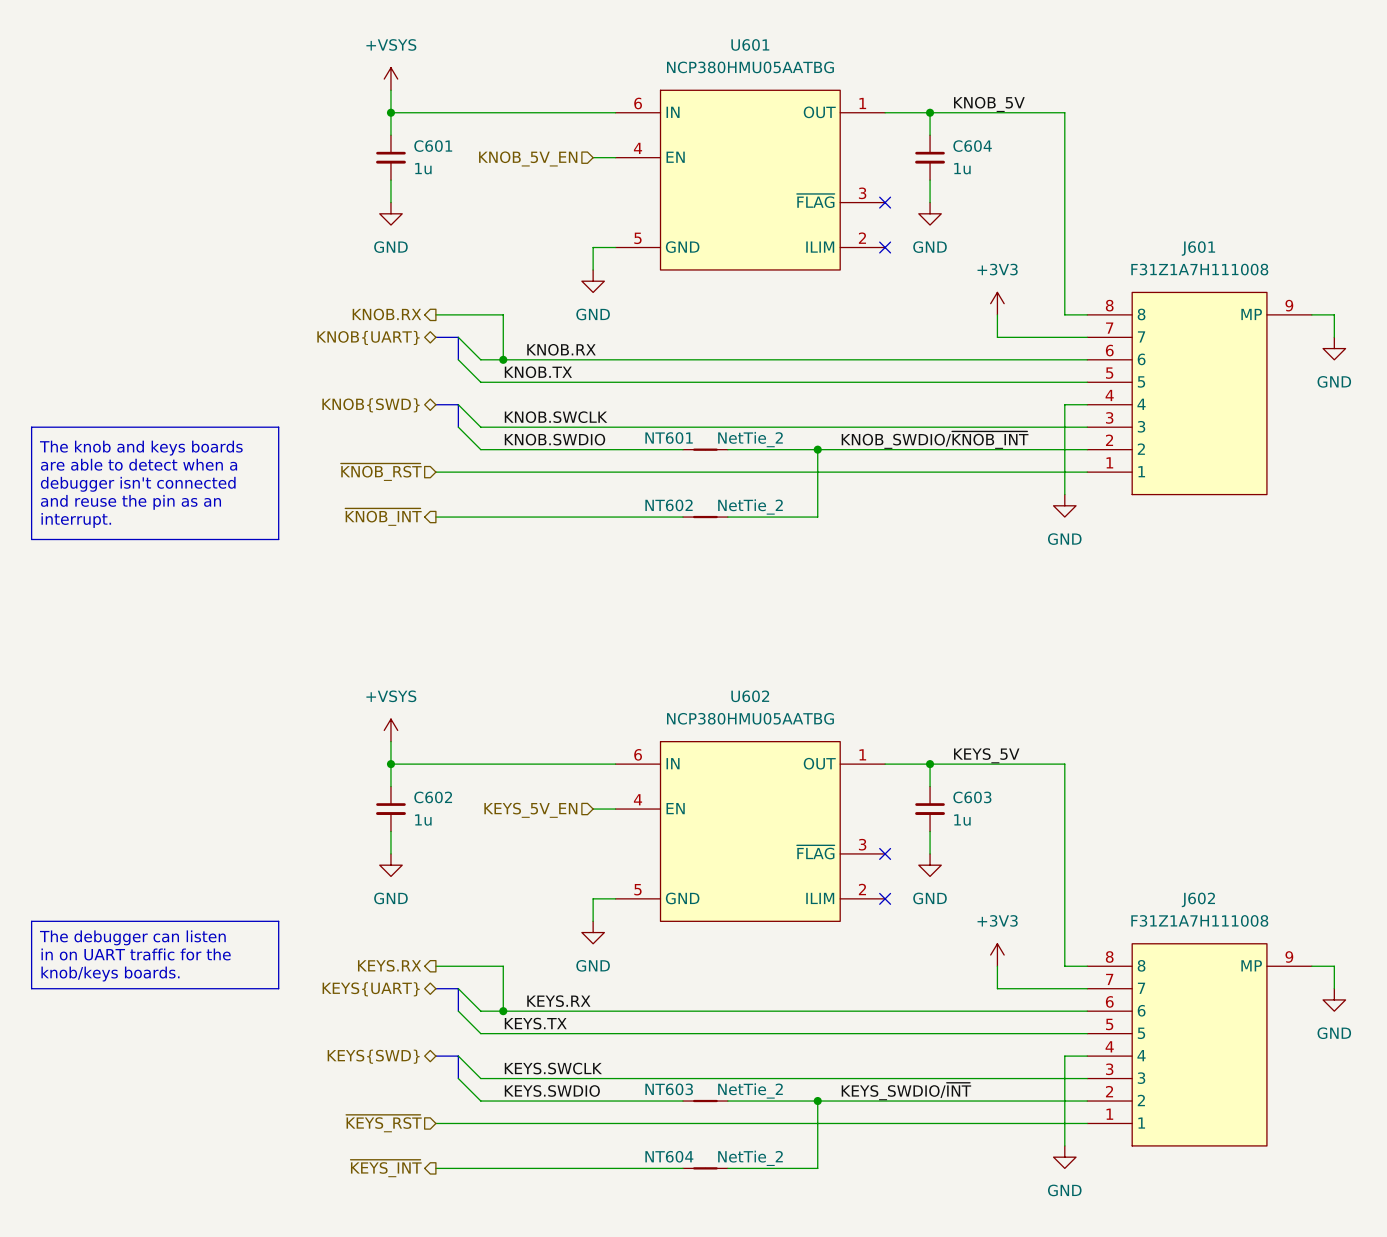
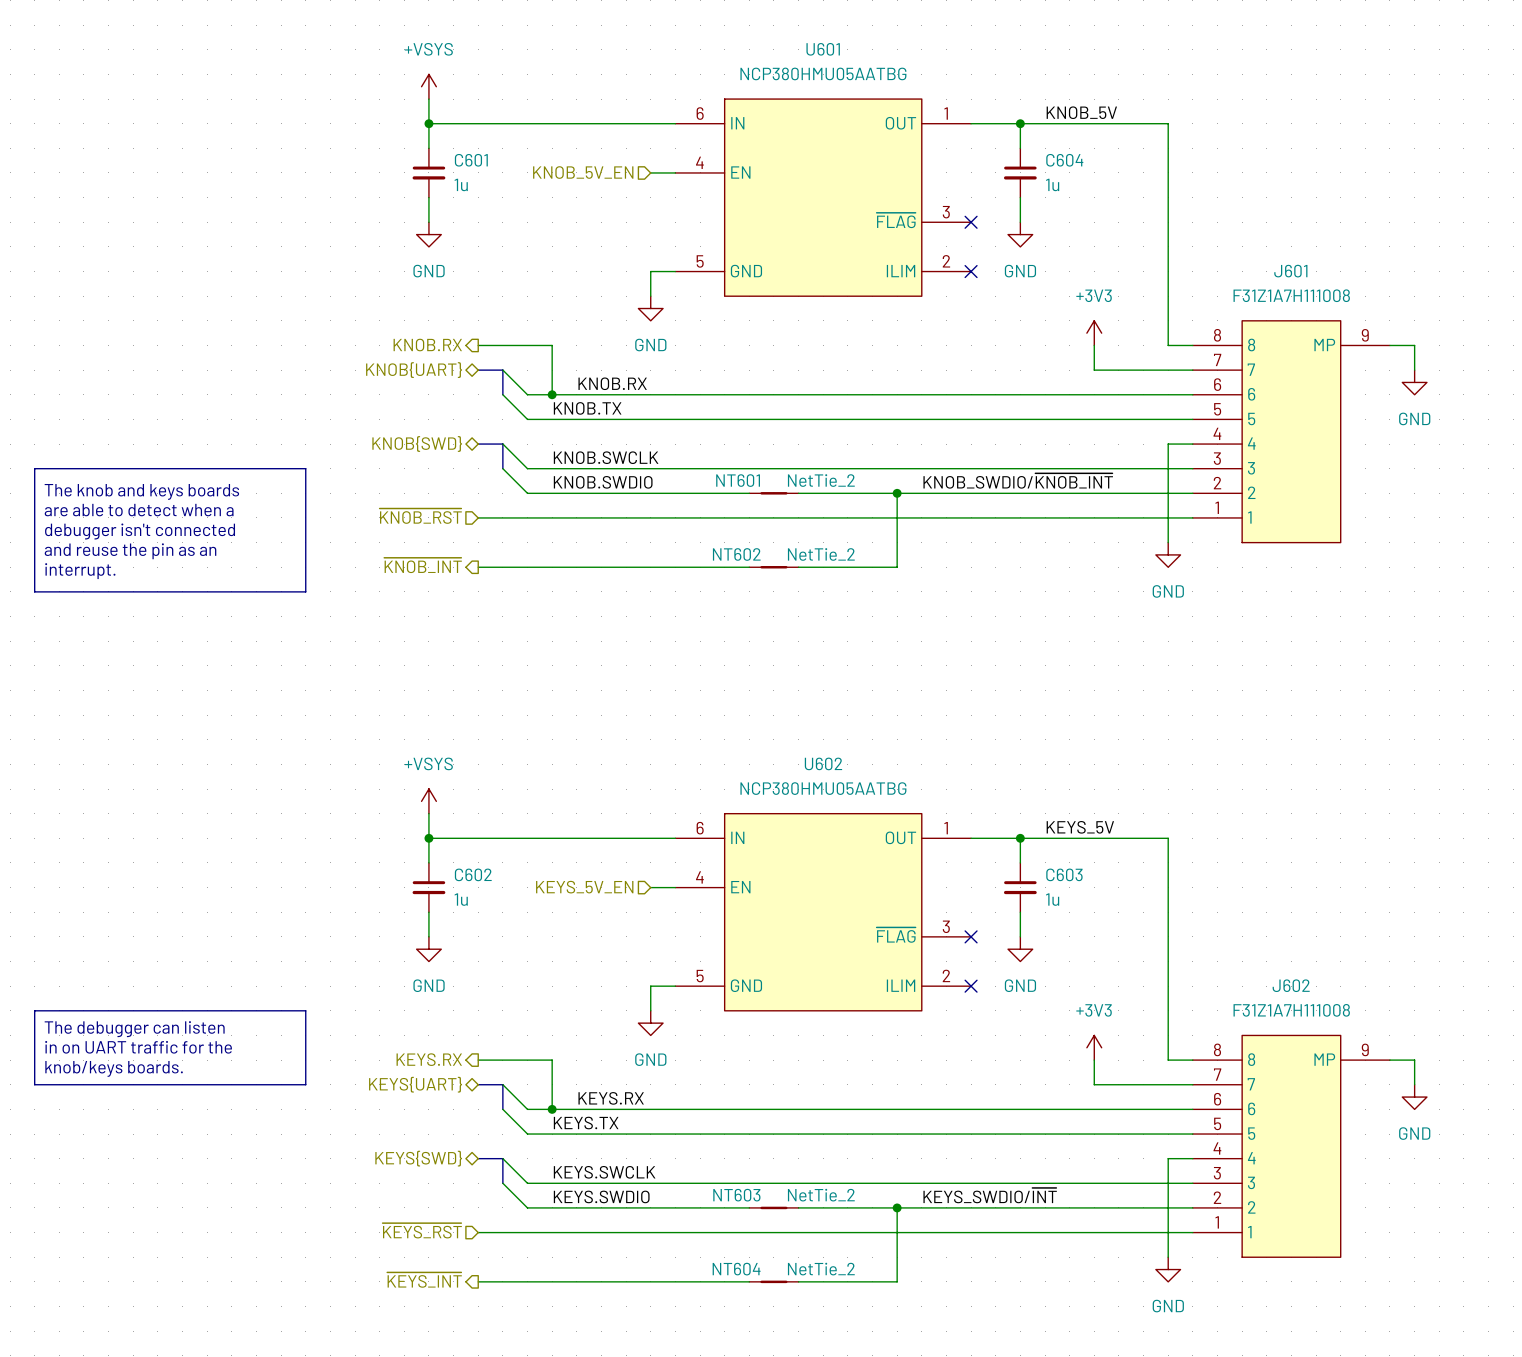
J601 symbol: [1087, 292, 1312, 495] -> [1192, 320, 1390, 543]
wire: (1311, 314) (1334, 314) (1334, 337) -> (1389, 345) (1414, 345) (1414, 370)
power symbol position: GND (1334, 348) -> GND (1414, 382)
J602 symbol: [1087, 943, 1312, 1146] -> [1192, 1035, 1390, 1258]
wire: (1311, 966) (1334, 966) (1334, 988) -> (1389, 1060) (1414, 1060) (1414, 1084)
power symbol position: GND (1334, 999) -> GND (1414, 1097)

